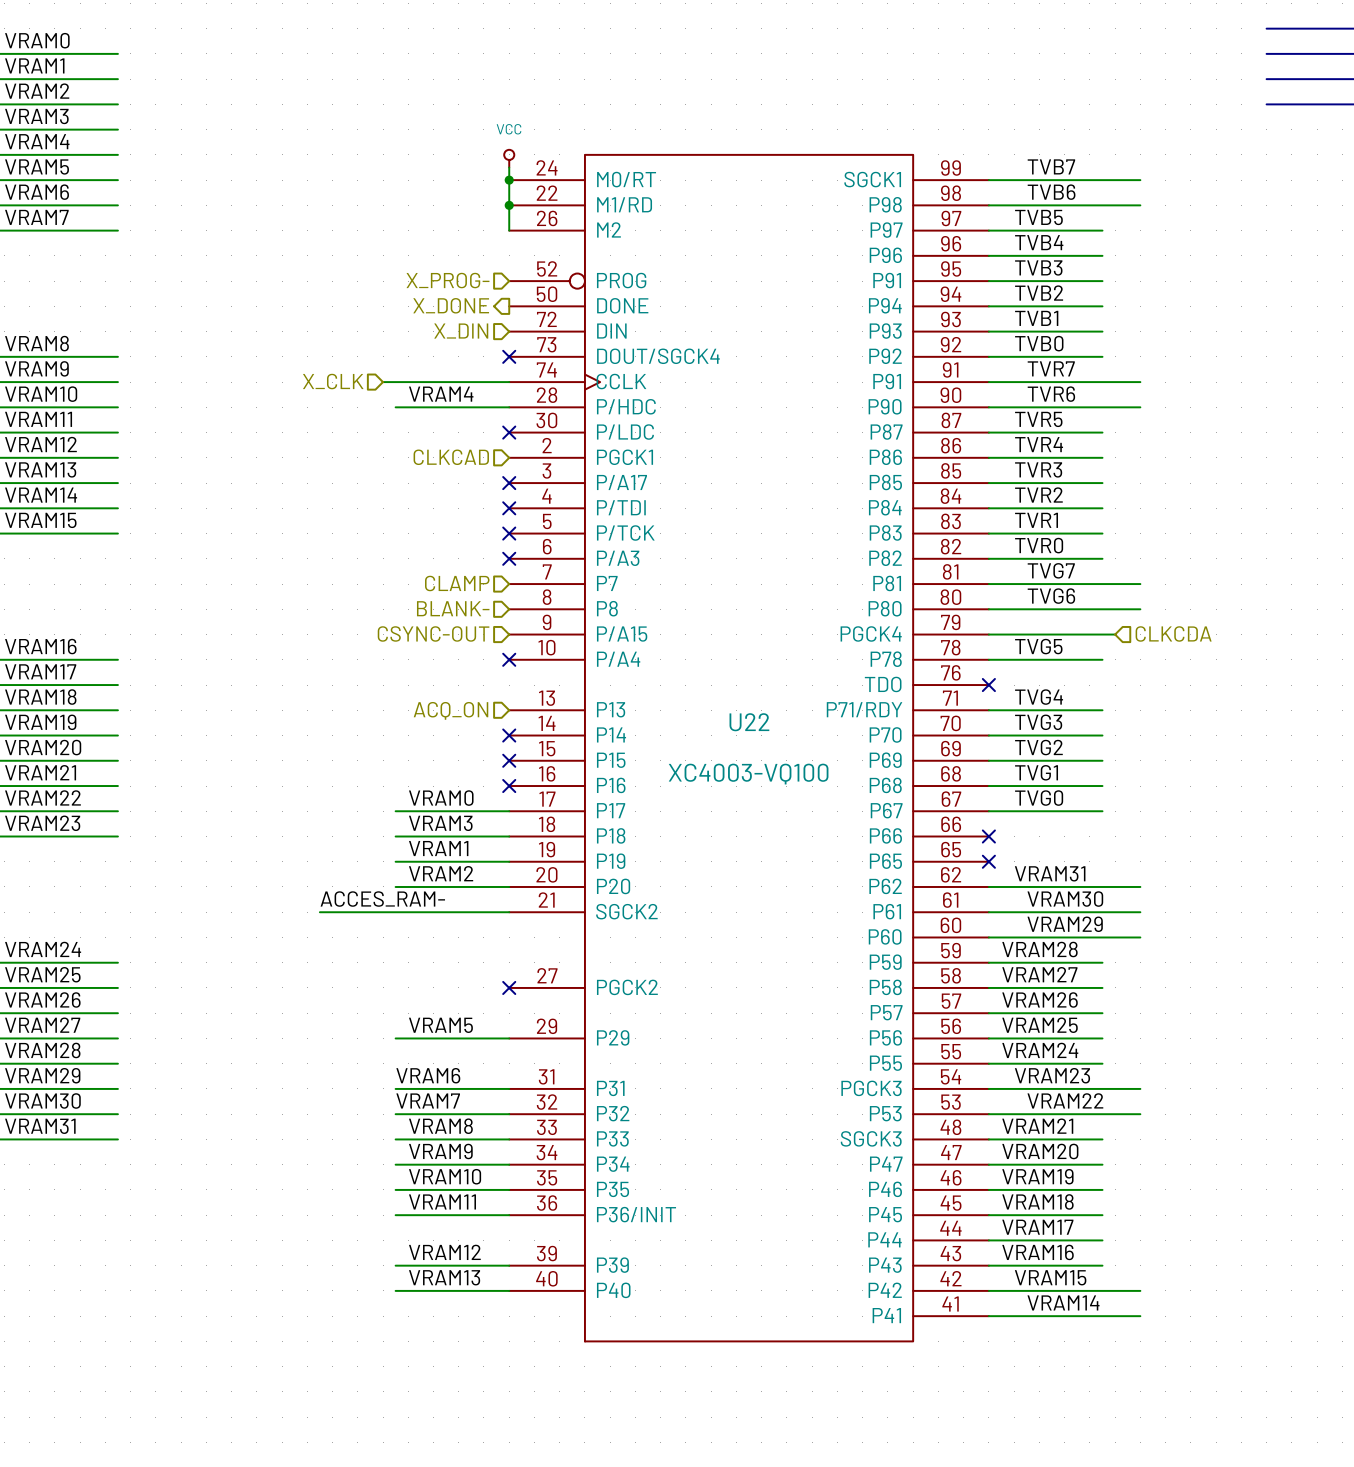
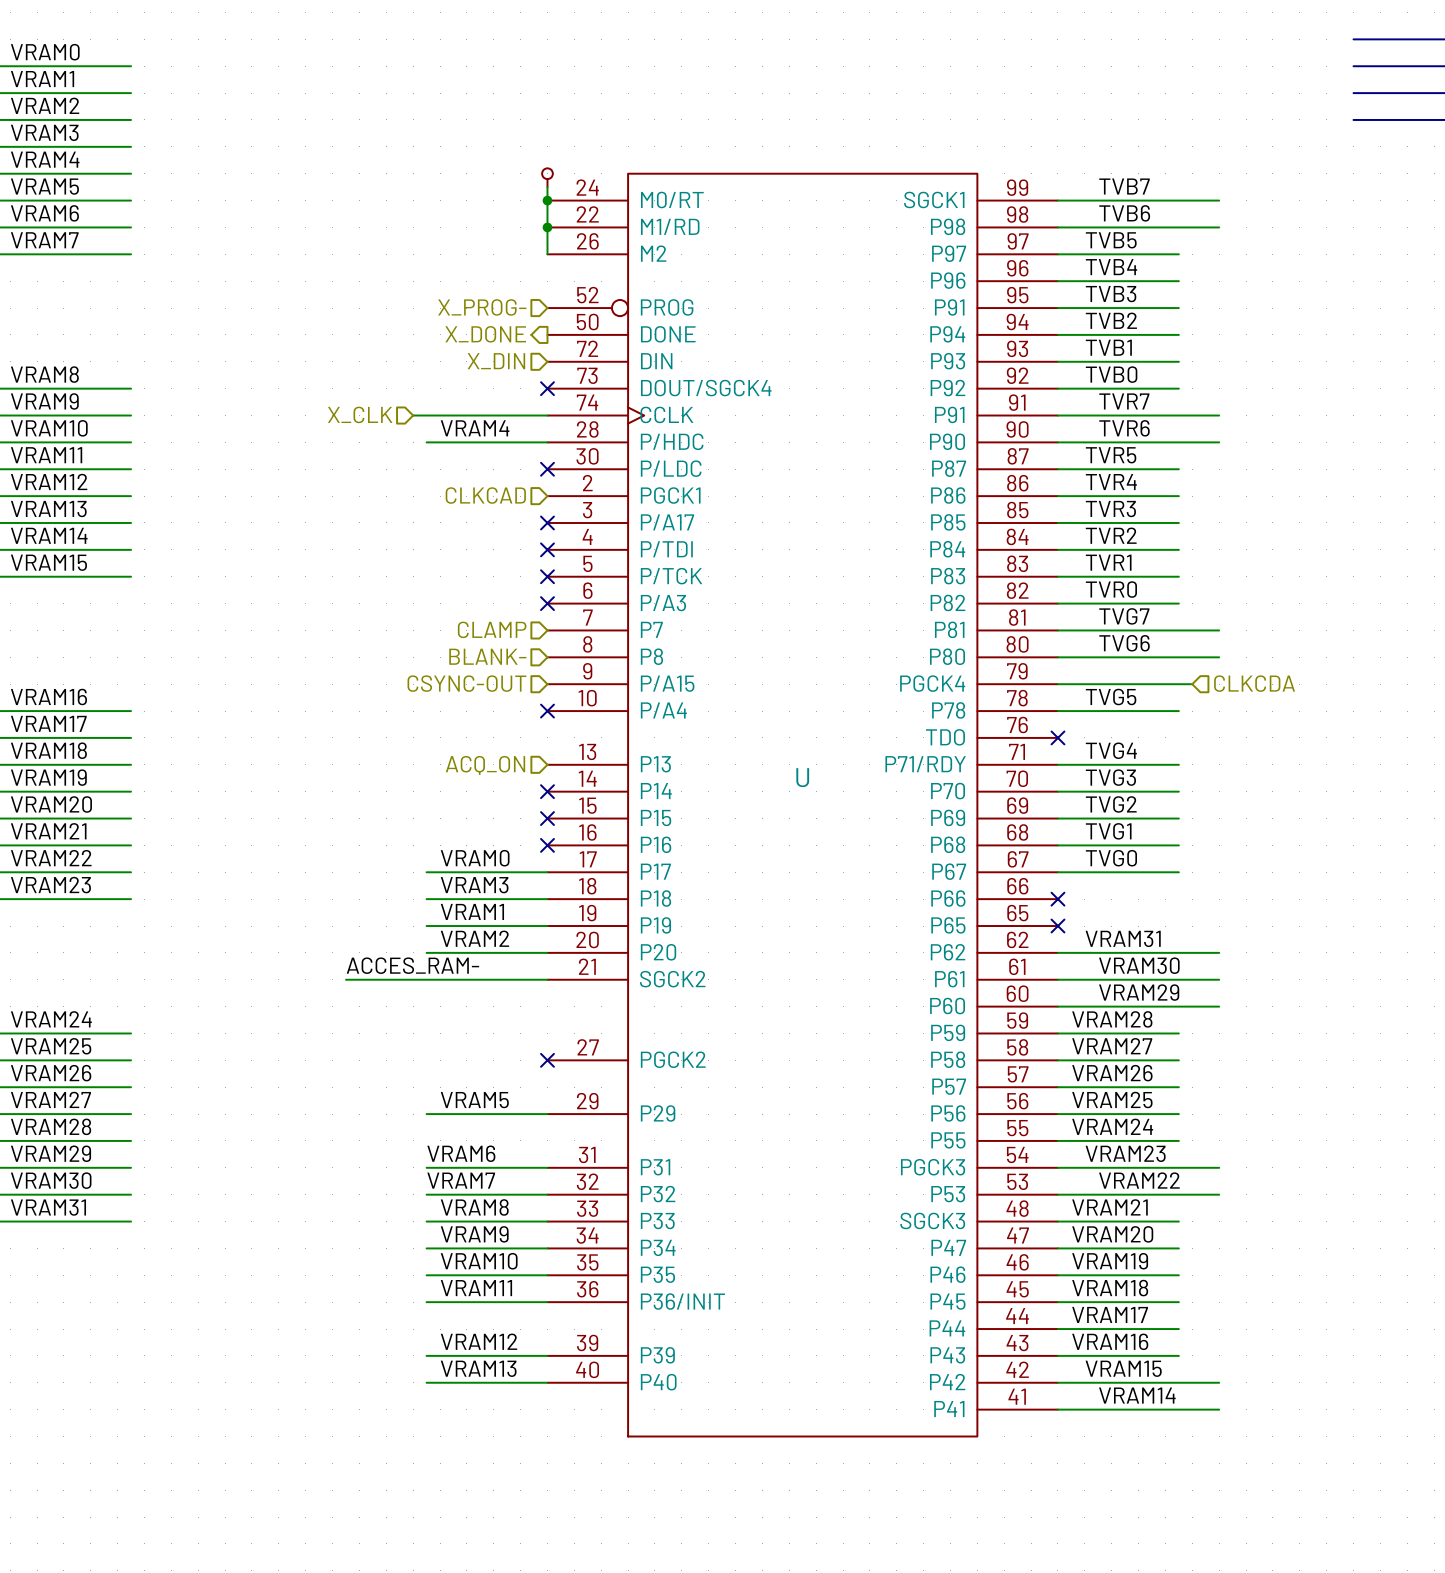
power symbol text: VCC (509, 129) -> none
U22 name: U22 (749, 722) -> U (802, 777)
U22 value: XC4003-VQ100 (748, 774) -> none

